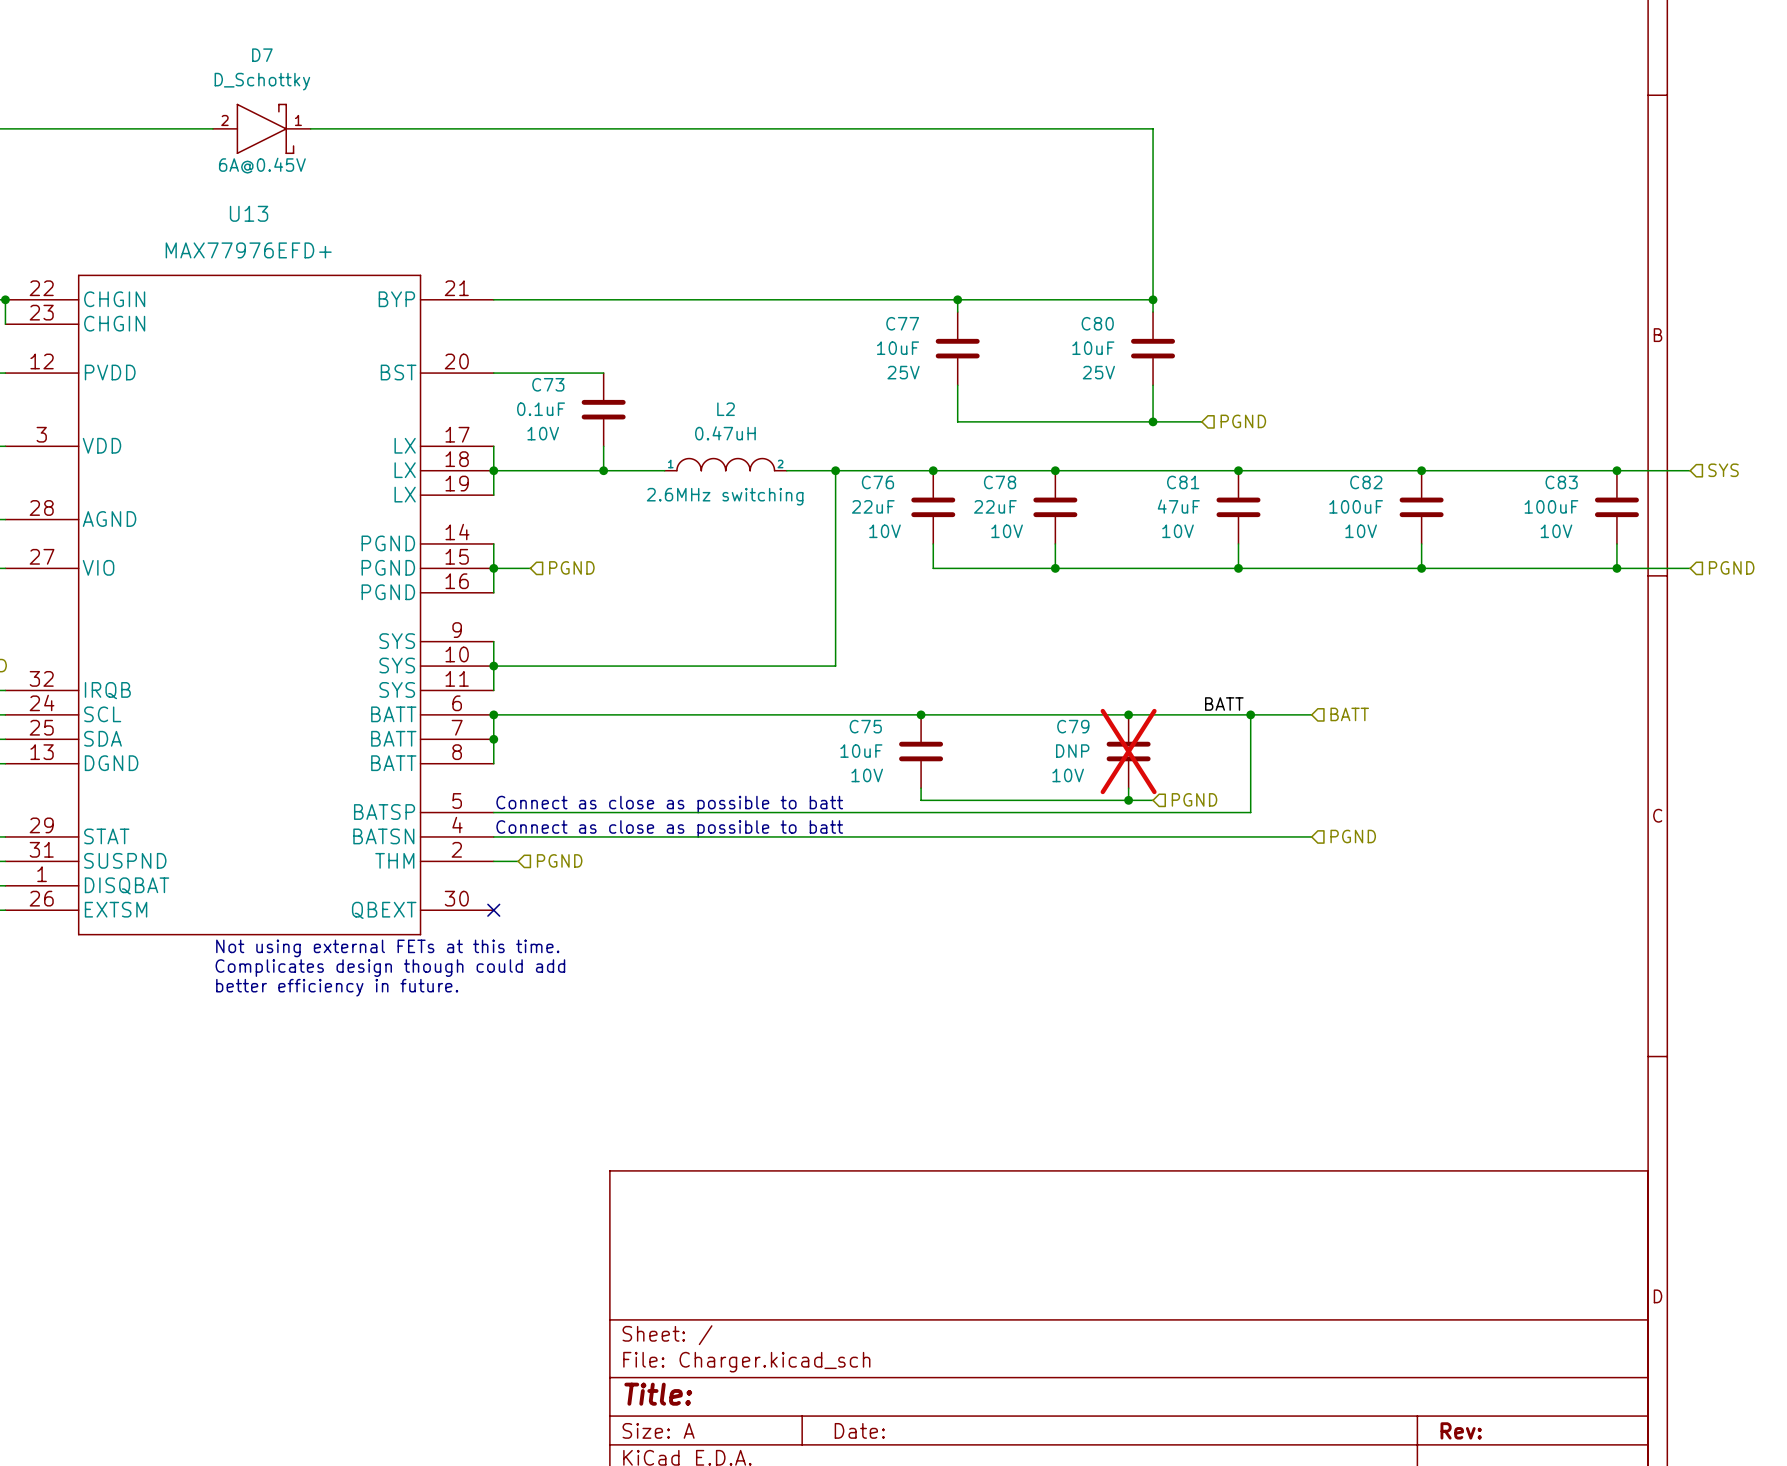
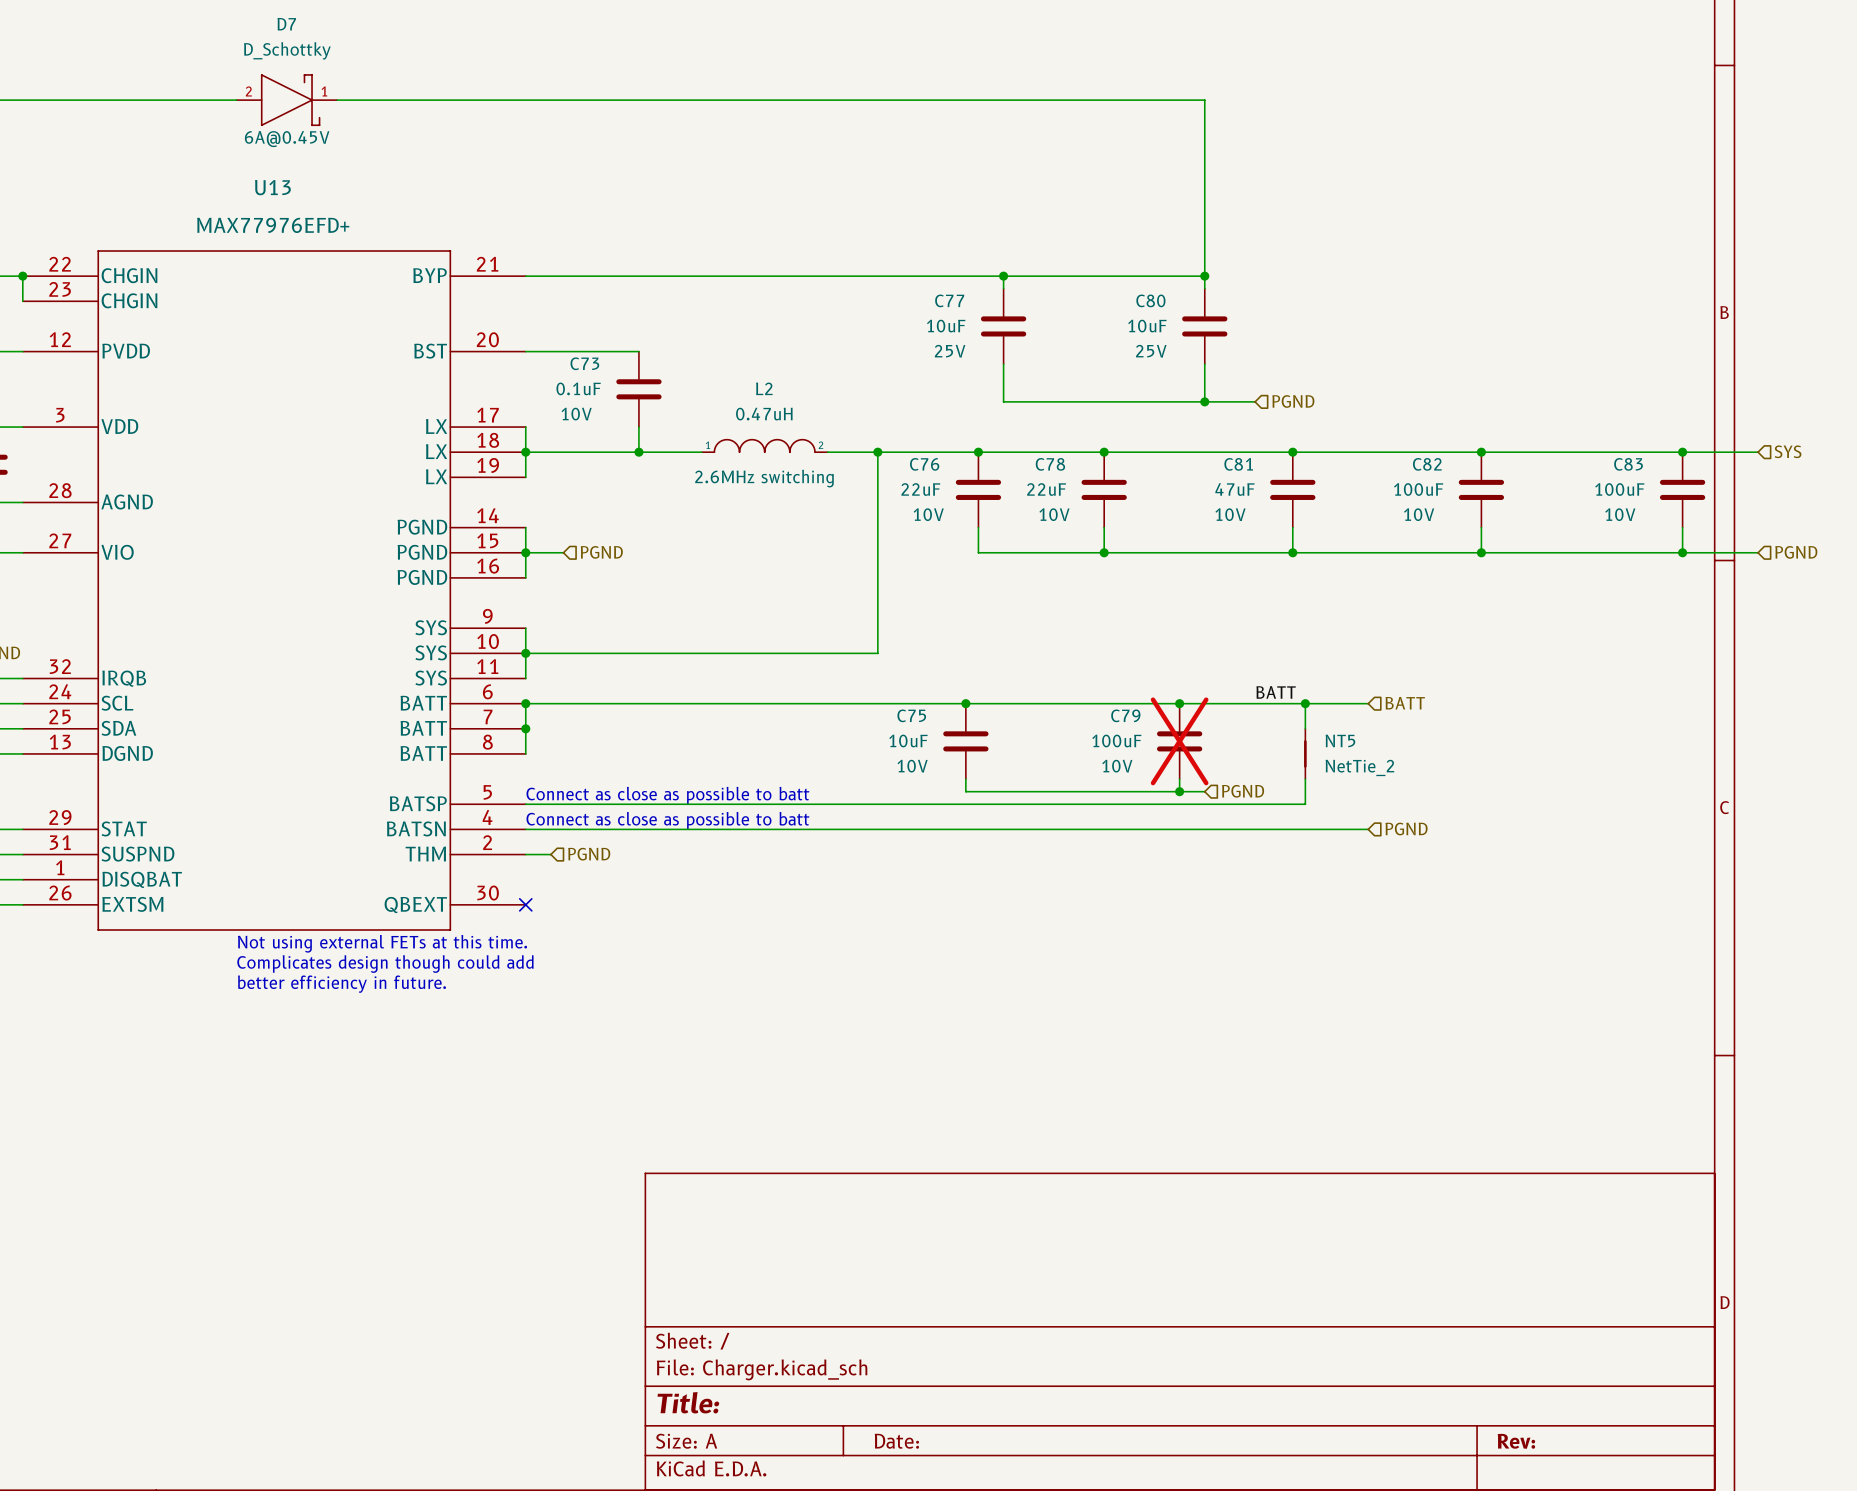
C79 value: DNP (1072, 751) -> 100uF (1116, 740)
NT5: none -> NetTie_2 (1305, 753)

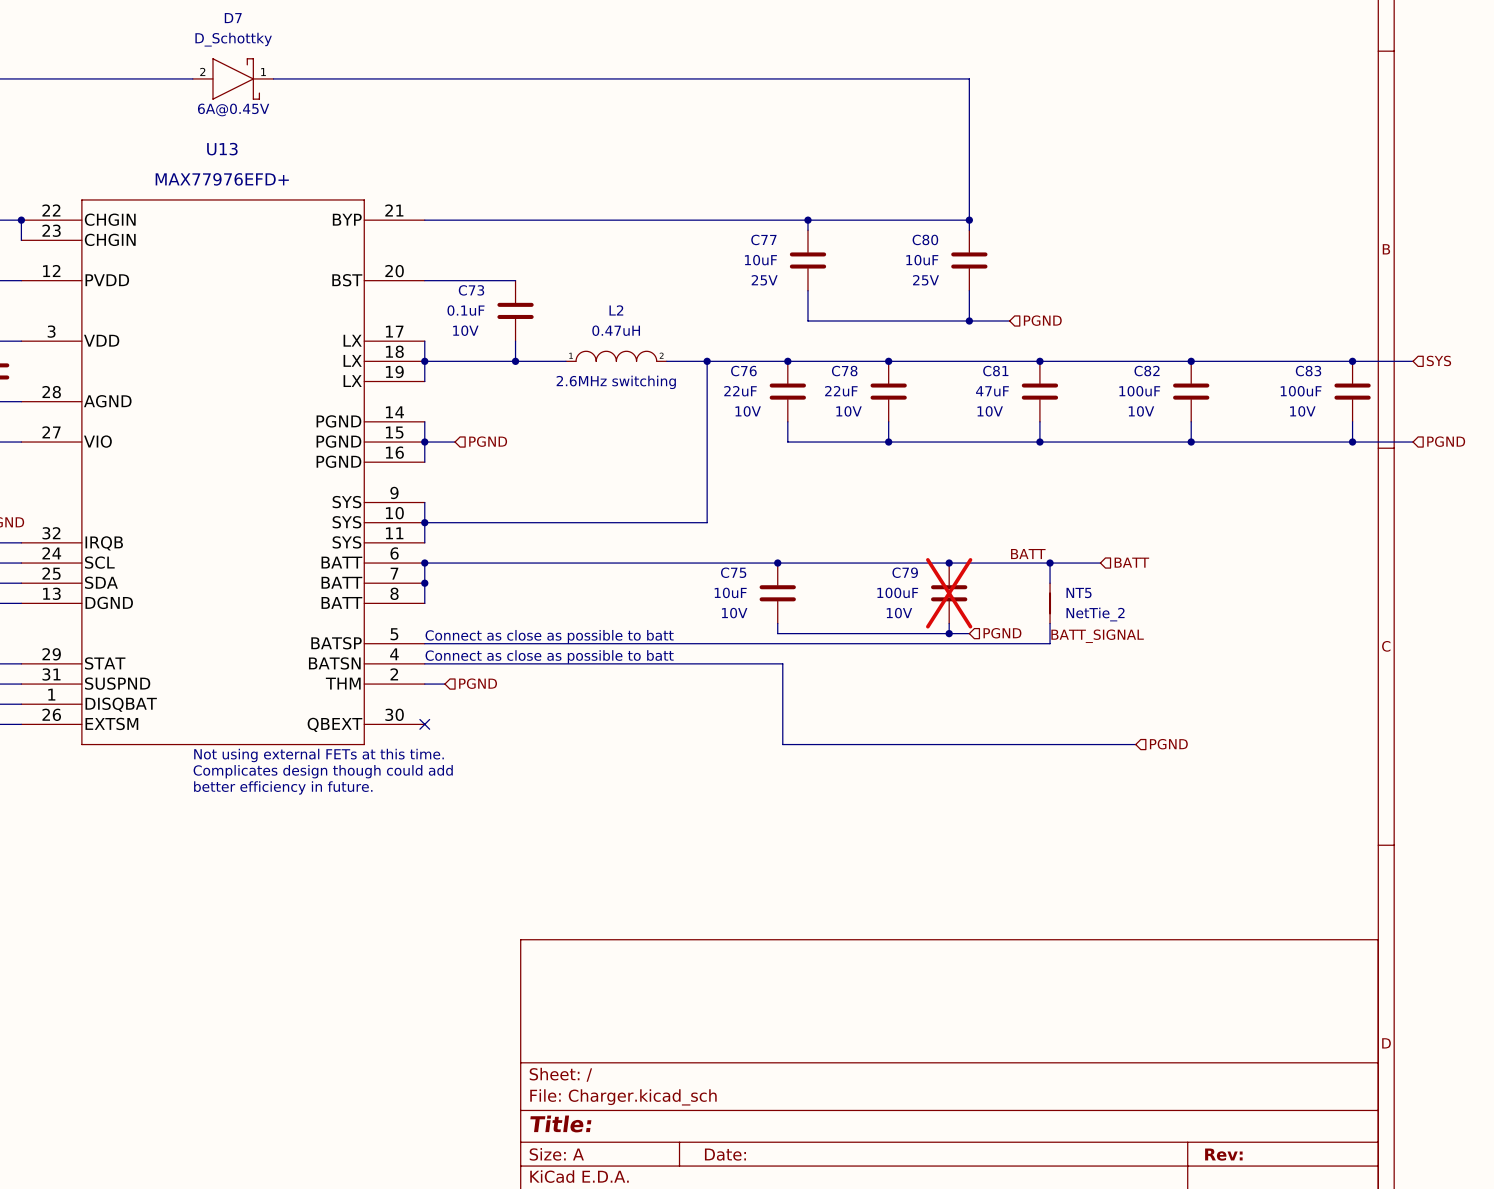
label: none -> BATT_SIGNAL (1097, 636)
wire: (972, 829) (1368, 829) -> (782, 663) (782, 744) (1135, 744)
hierarchical label position: PGND (1406, 829) -> PGND (1168, 744)

